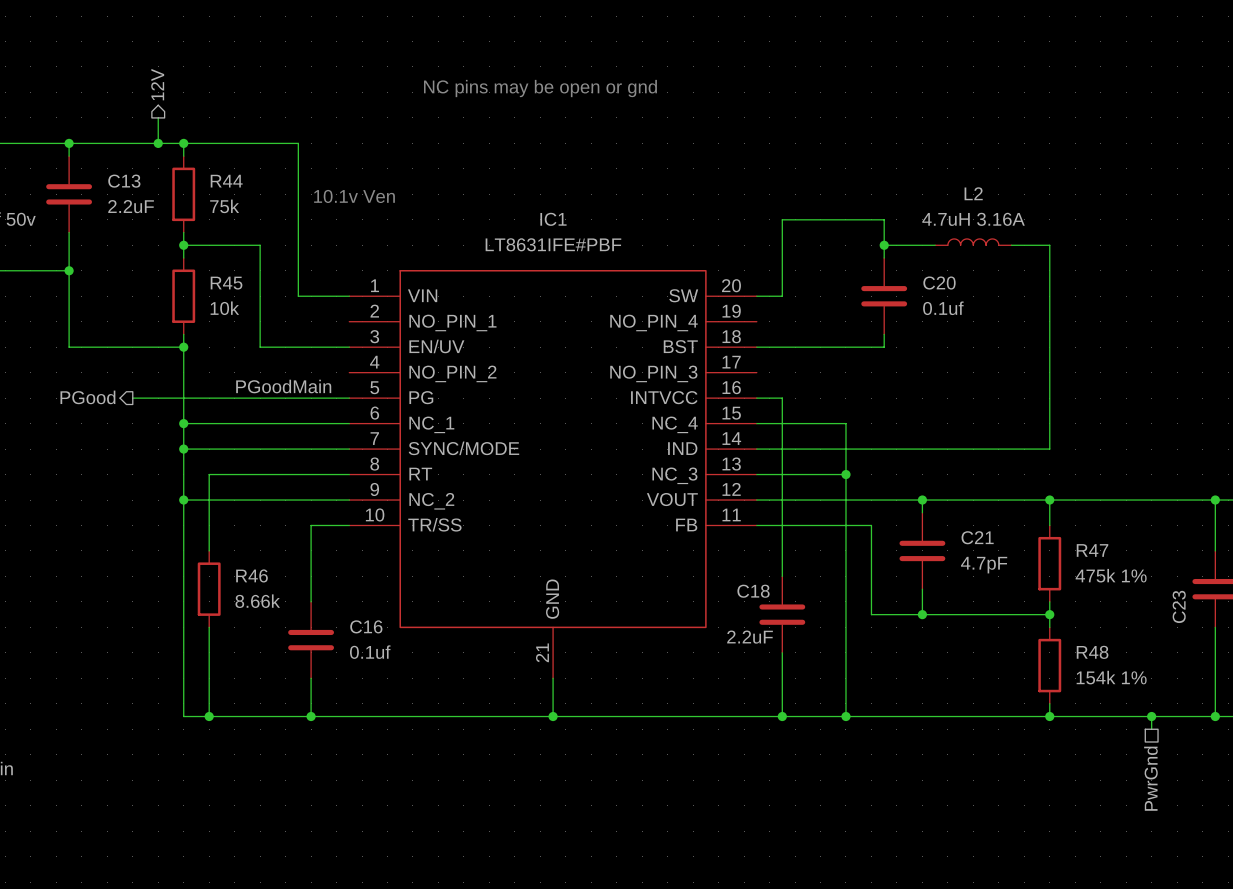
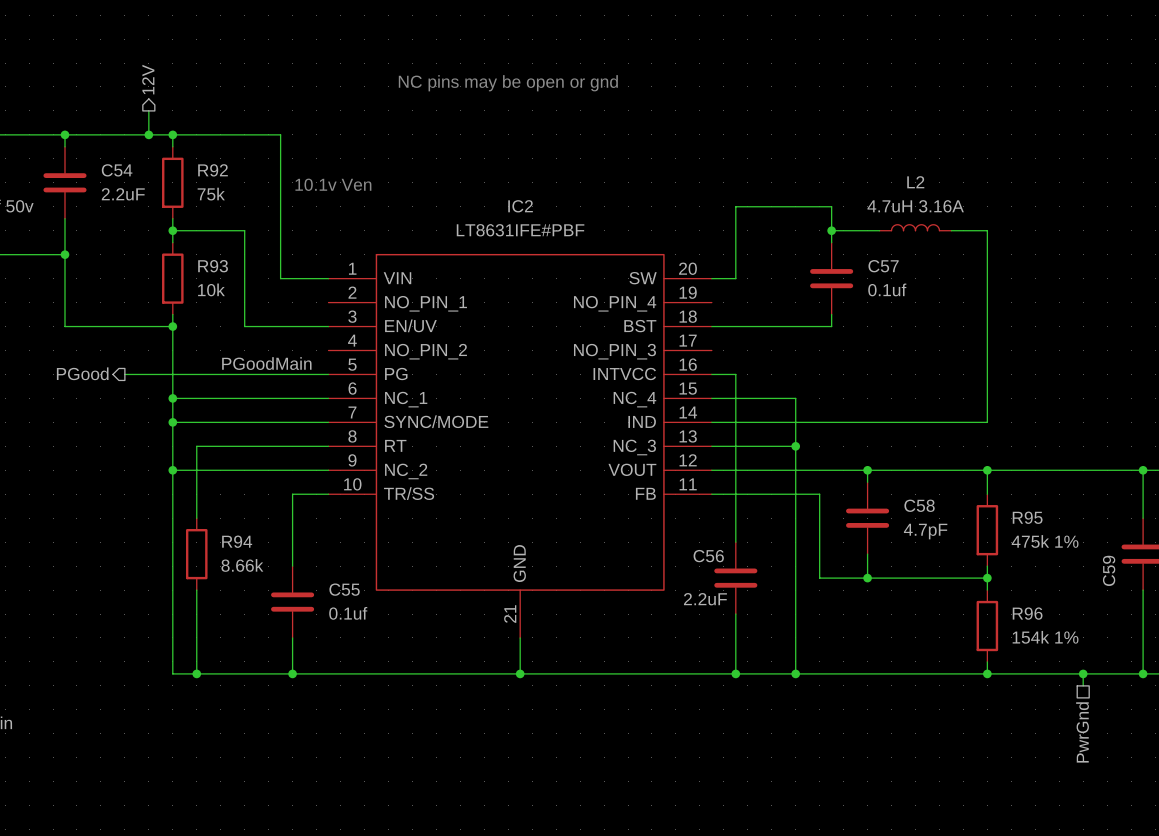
C13 name: C13 (124, 181) -> C54 (117, 170)
R44 name: R44 (226, 181) -> R92 (213, 170)
IC1 name: IC1 (553, 219) -> IC2 (520, 206)
R45 name: R45 (226, 283) -> R93 (213, 266)
C20 name: C20 (939, 283) -> C57 (883, 266)
C21 name: C21 (977, 537) -> C58 (919, 505)
R47 name: R47 (1092, 550) -> R95 (1027, 517)
R46 name: R46 (252, 575) -> R94 (237, 541)
C18 name: C18 (753, 591) -> C56 (708, 556)
C23 name: C23 (1179, 606) -> C59 (1109, 570)
C16 name: C16 (366, 626) -> C55 (344, 589)
R48 name: R48 (1092, 652) -> R96 (1027, 613)

